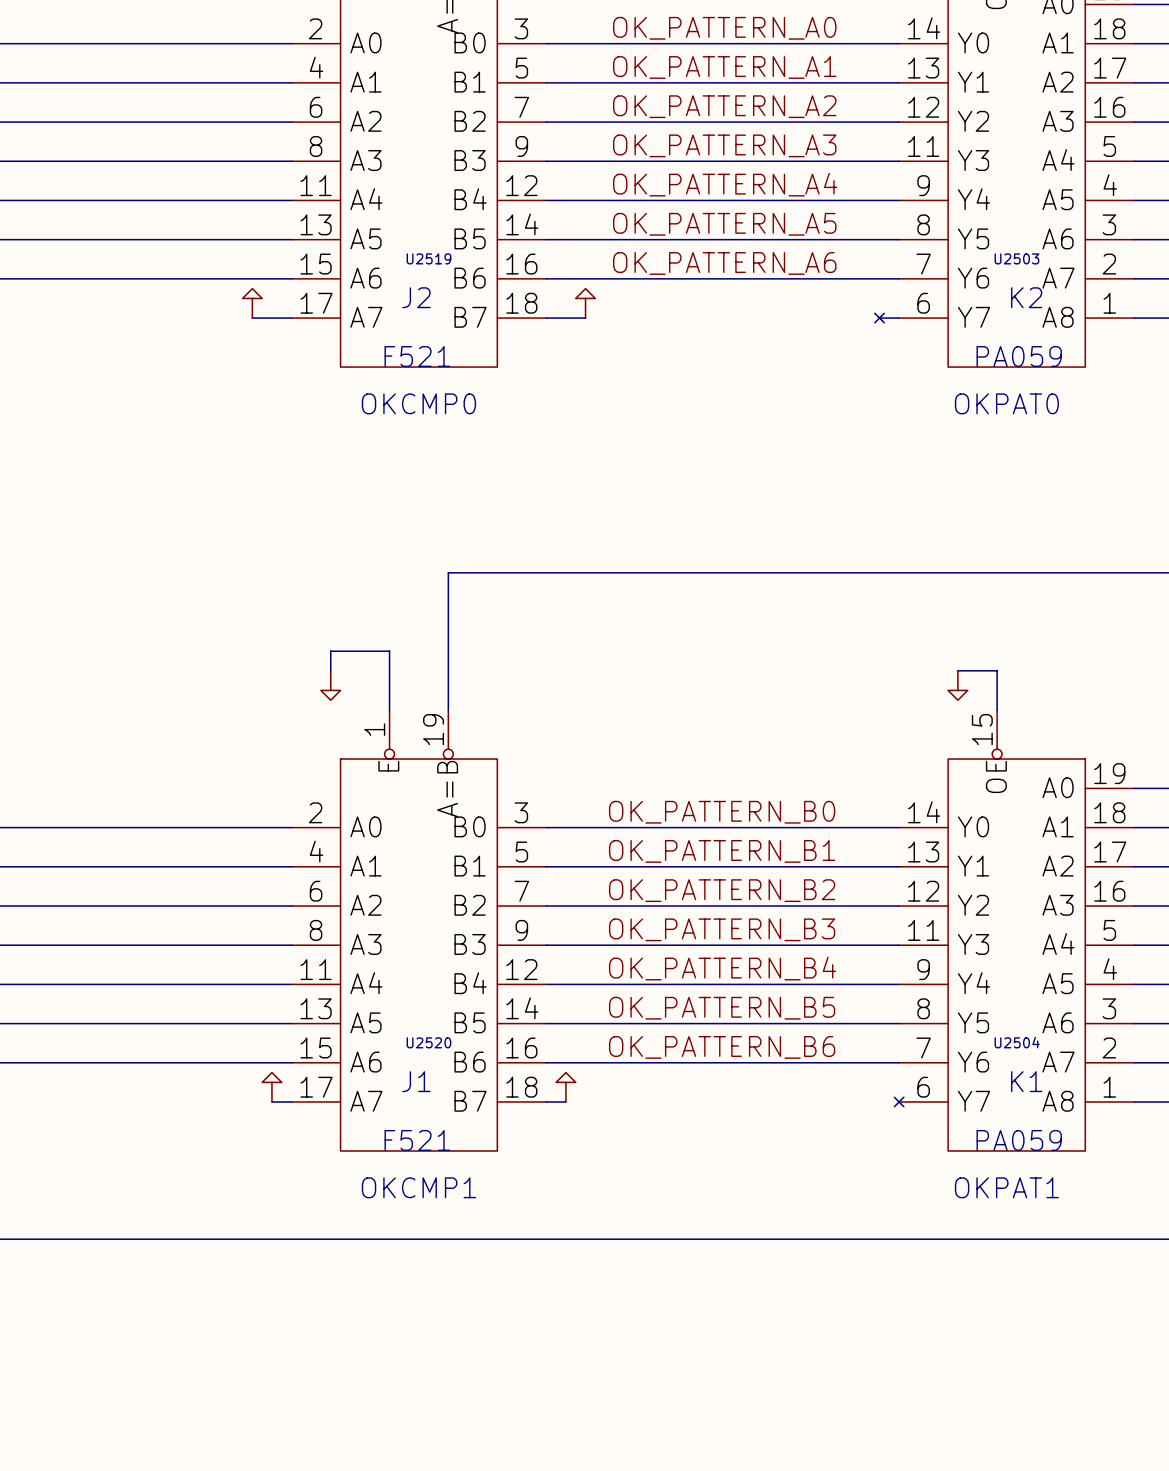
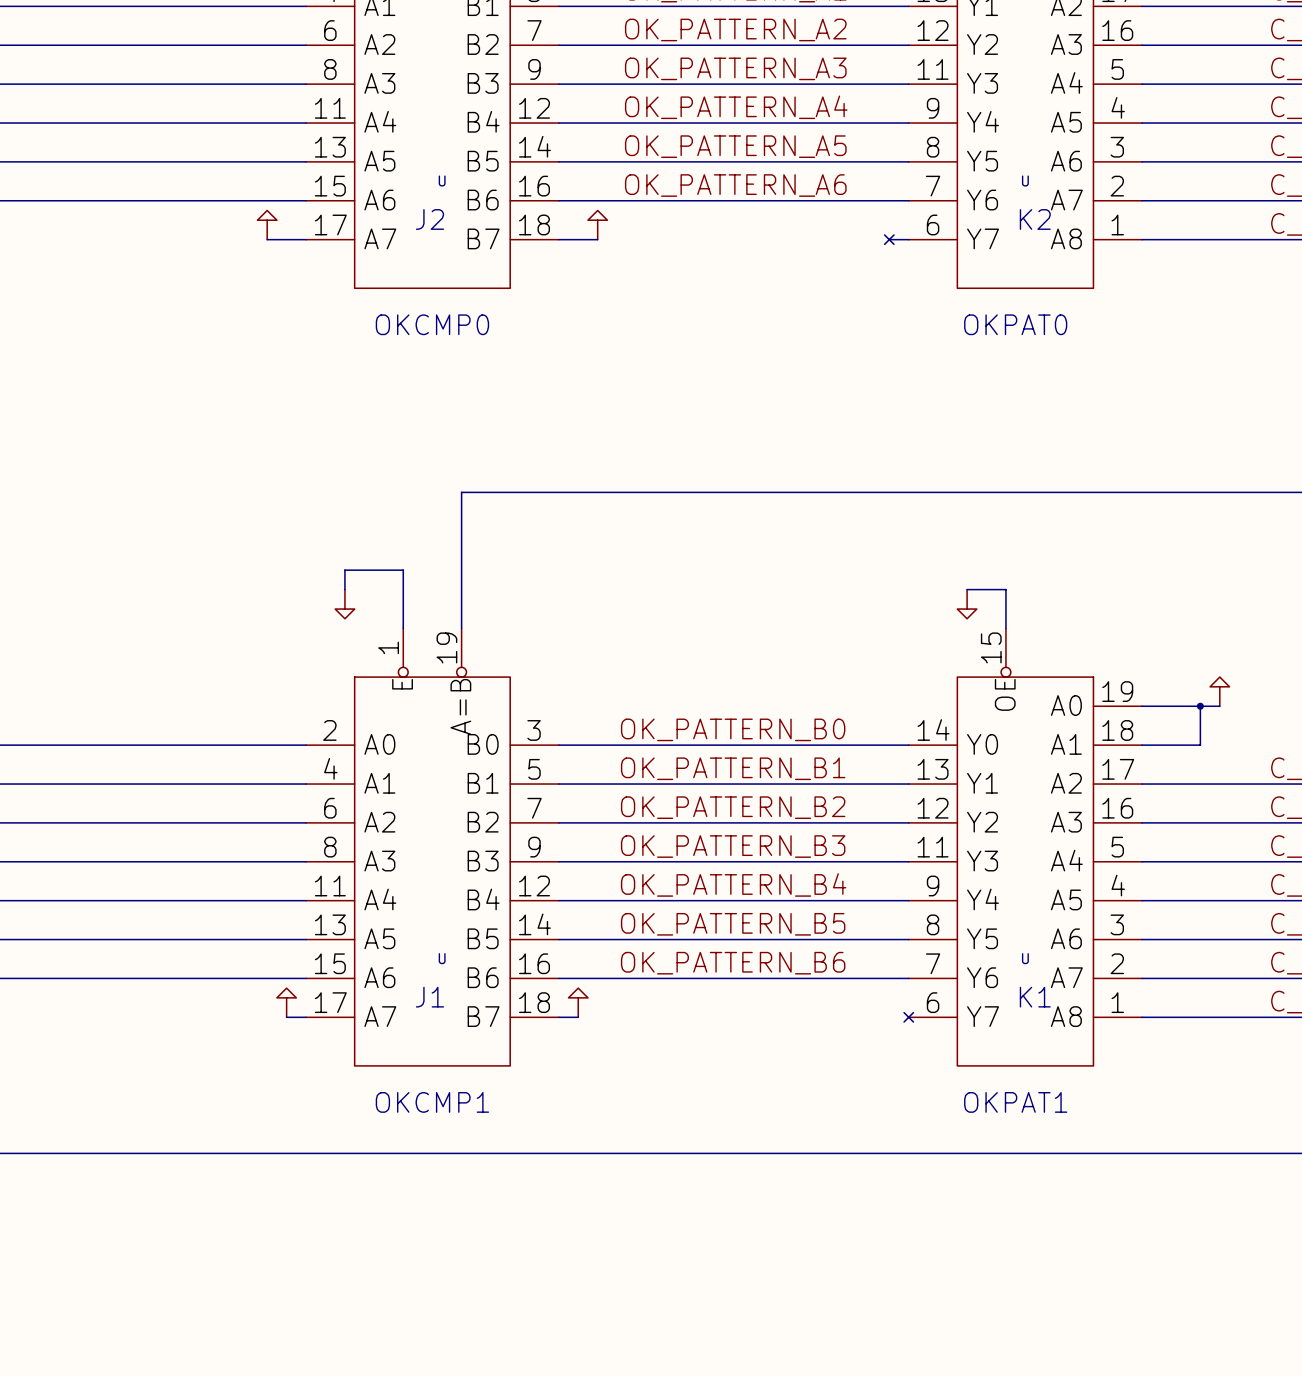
U2519 name: U2519 (428, 258) -> U (442, 180)
U2503 name: U2503 (1016, 258) -> U (1025, 180)
U2519 value: F521 (417, 356) -> none
U2503 value: PA059 (1019, 356) -> none
U2520 name: U2520 (428, 1042) -> U (442, 958)
U2504 name: U2504 (1017, 1042) -> U (1025, 958)
U2520 value: F521 (417, 1140) -> none
U2504 value: PA059 (1019, 1140) -> none

